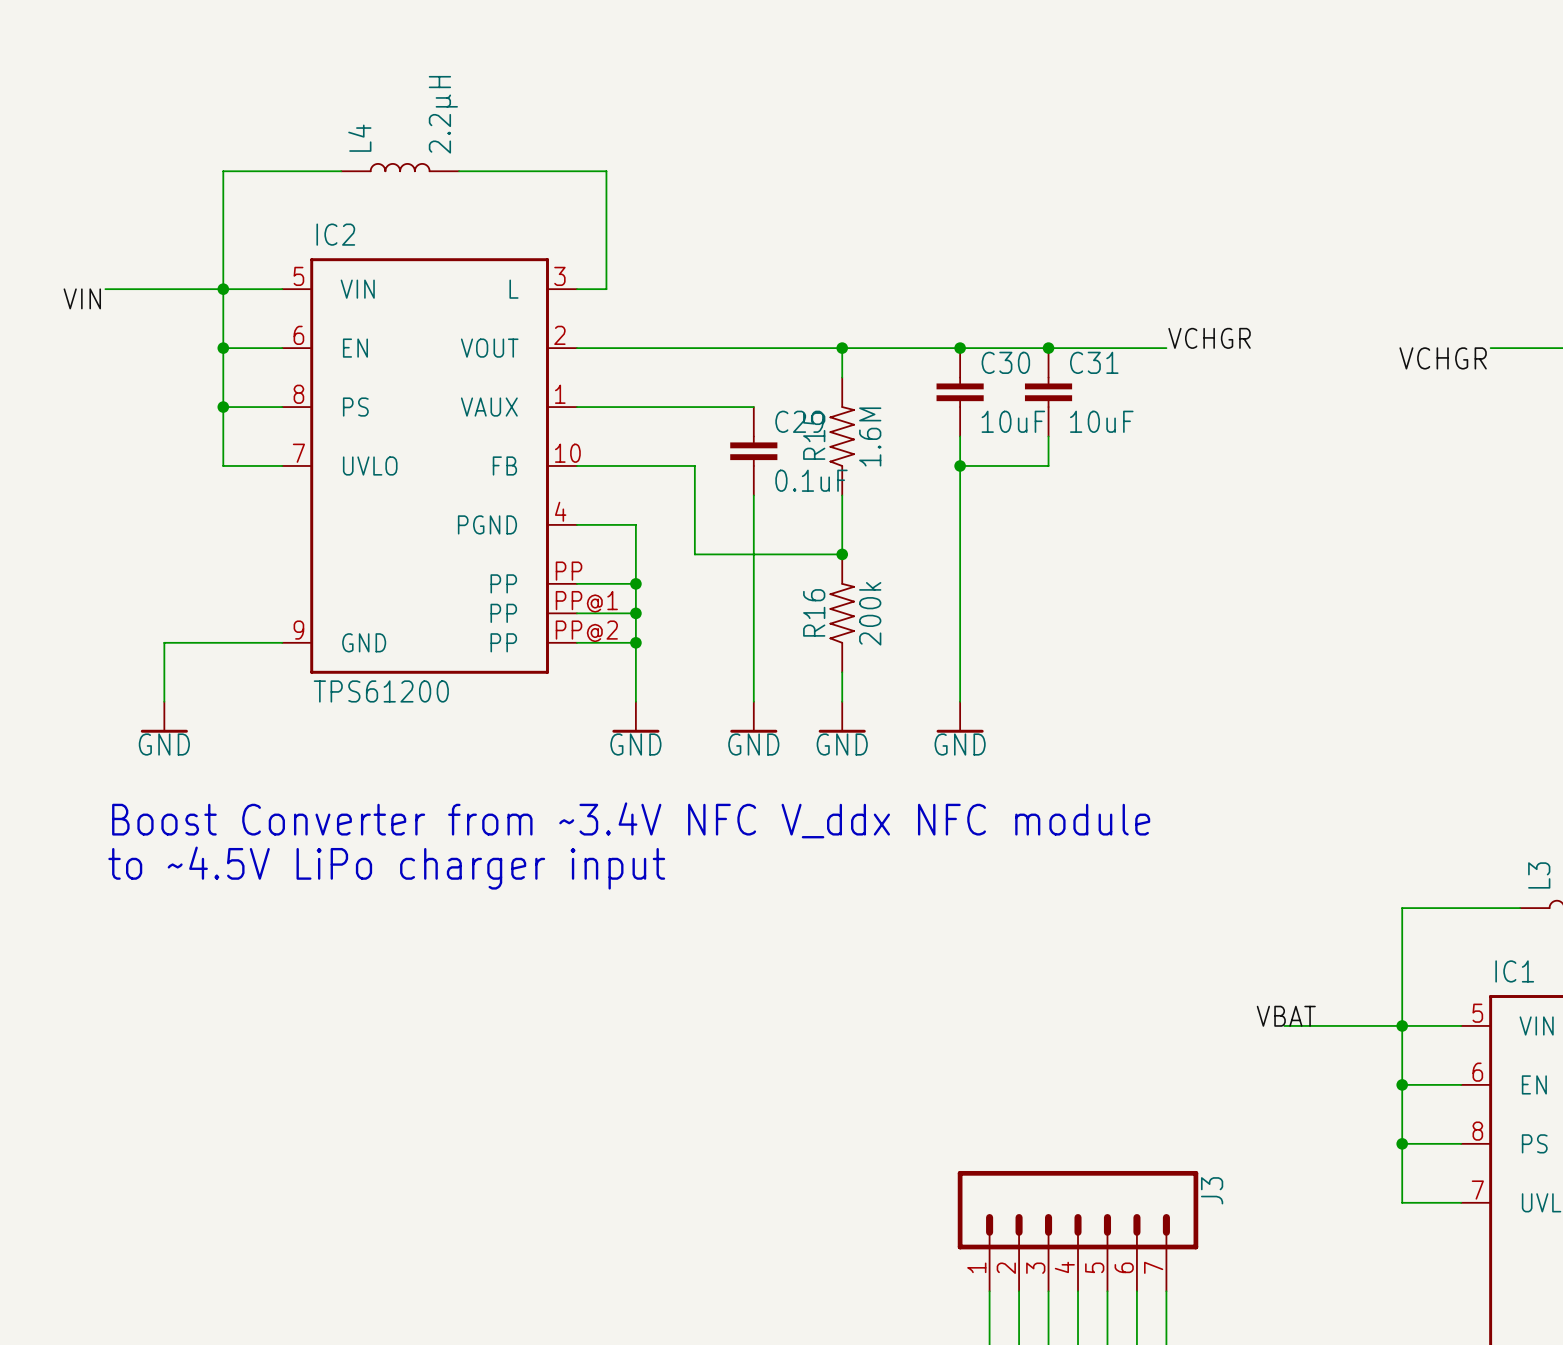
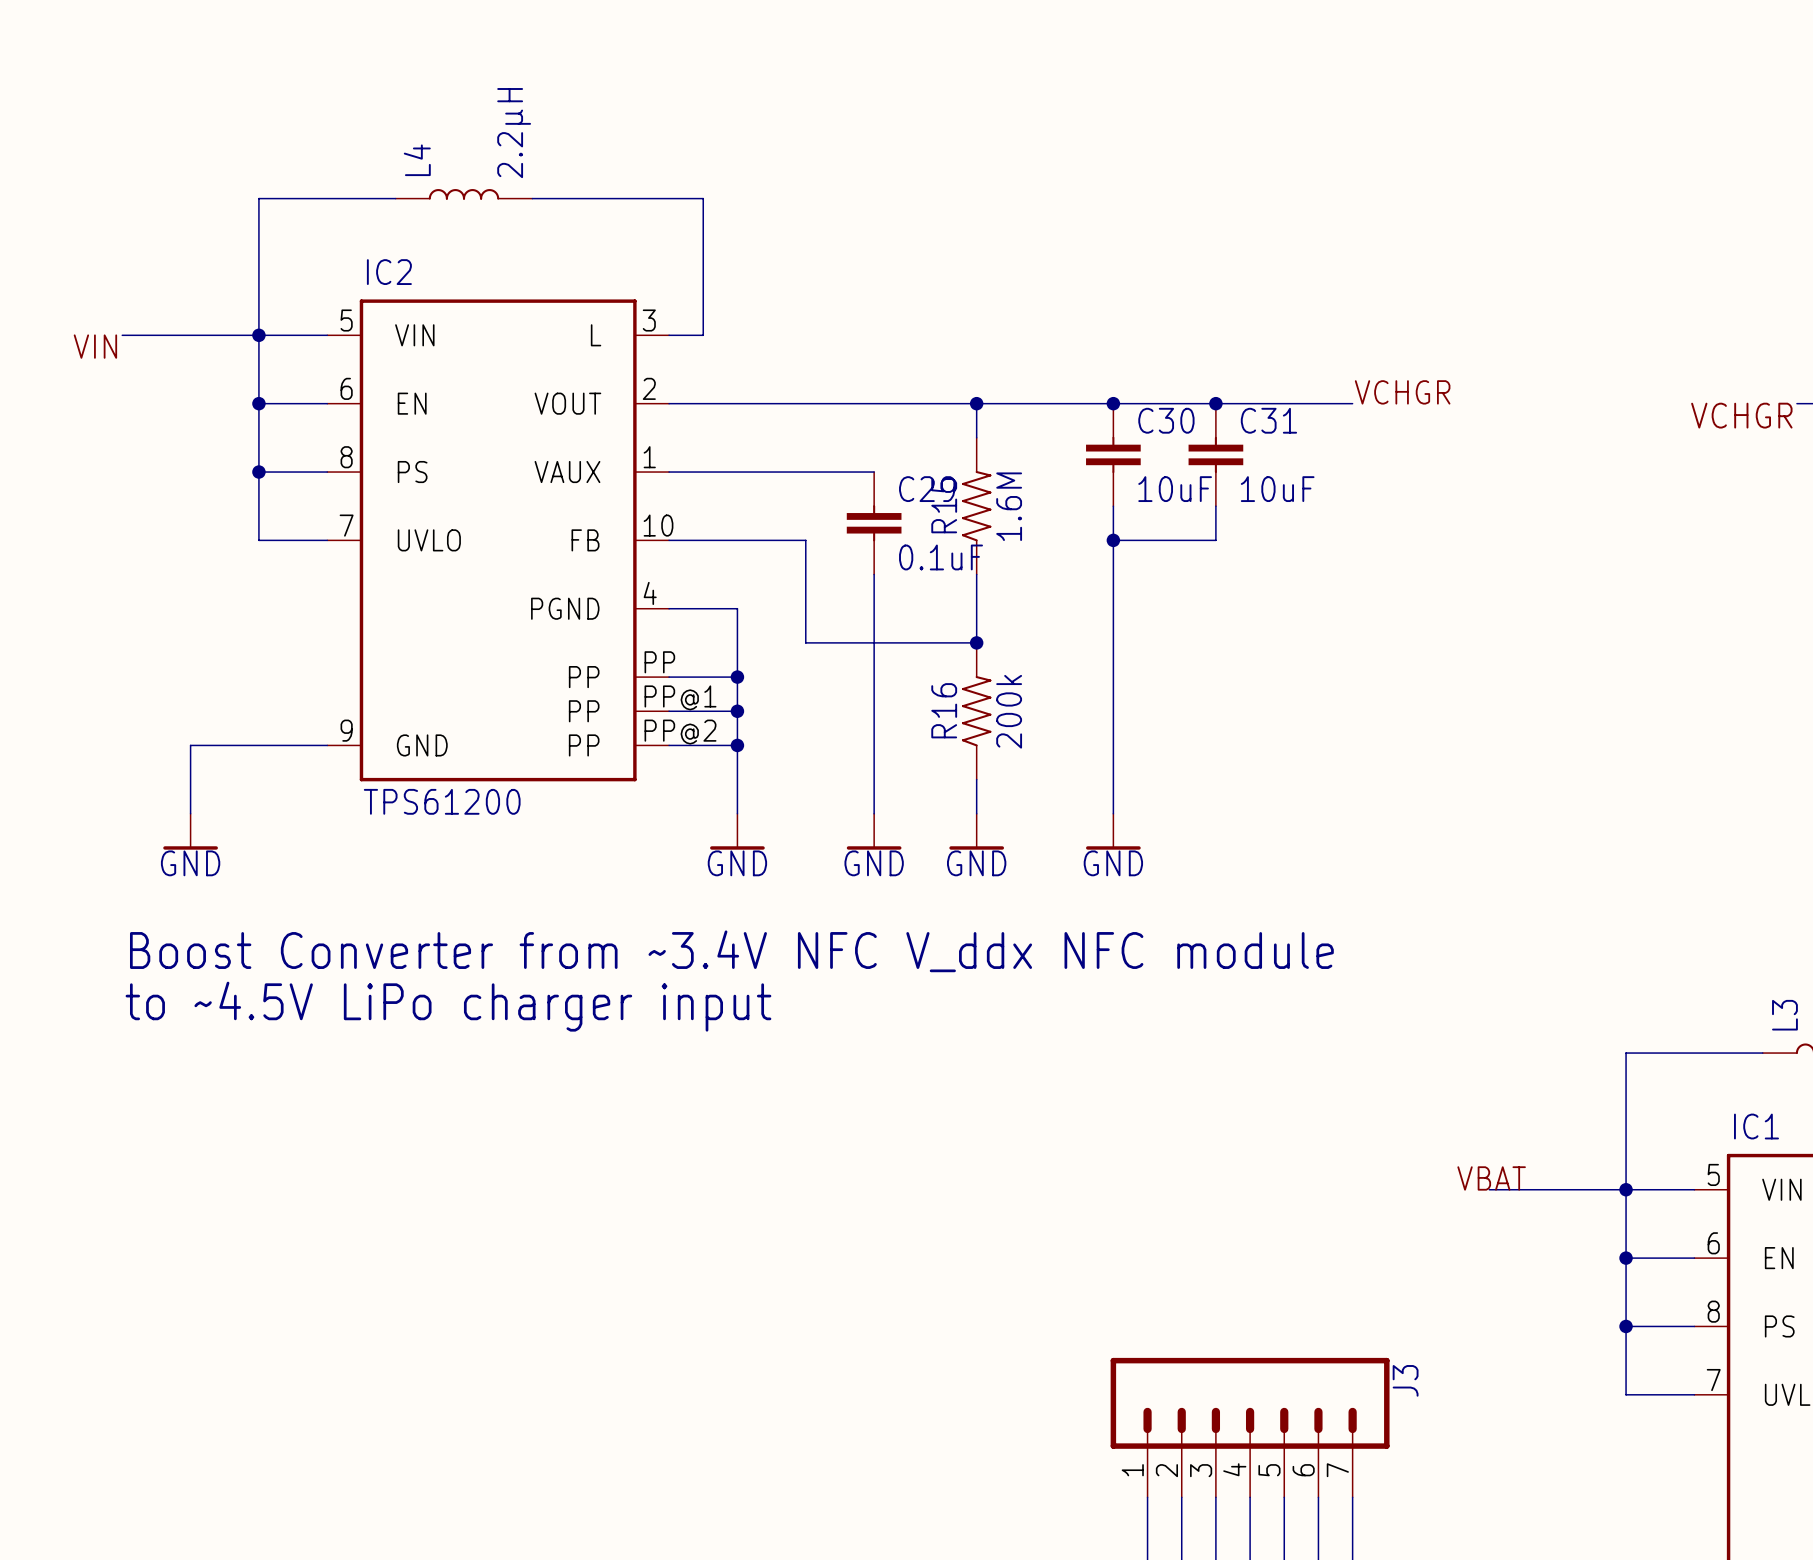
wire: (1490, 348) (1549, 348) -> none
label position: VCHGR (1443, 358) -> VCHGR (1741, 415)

